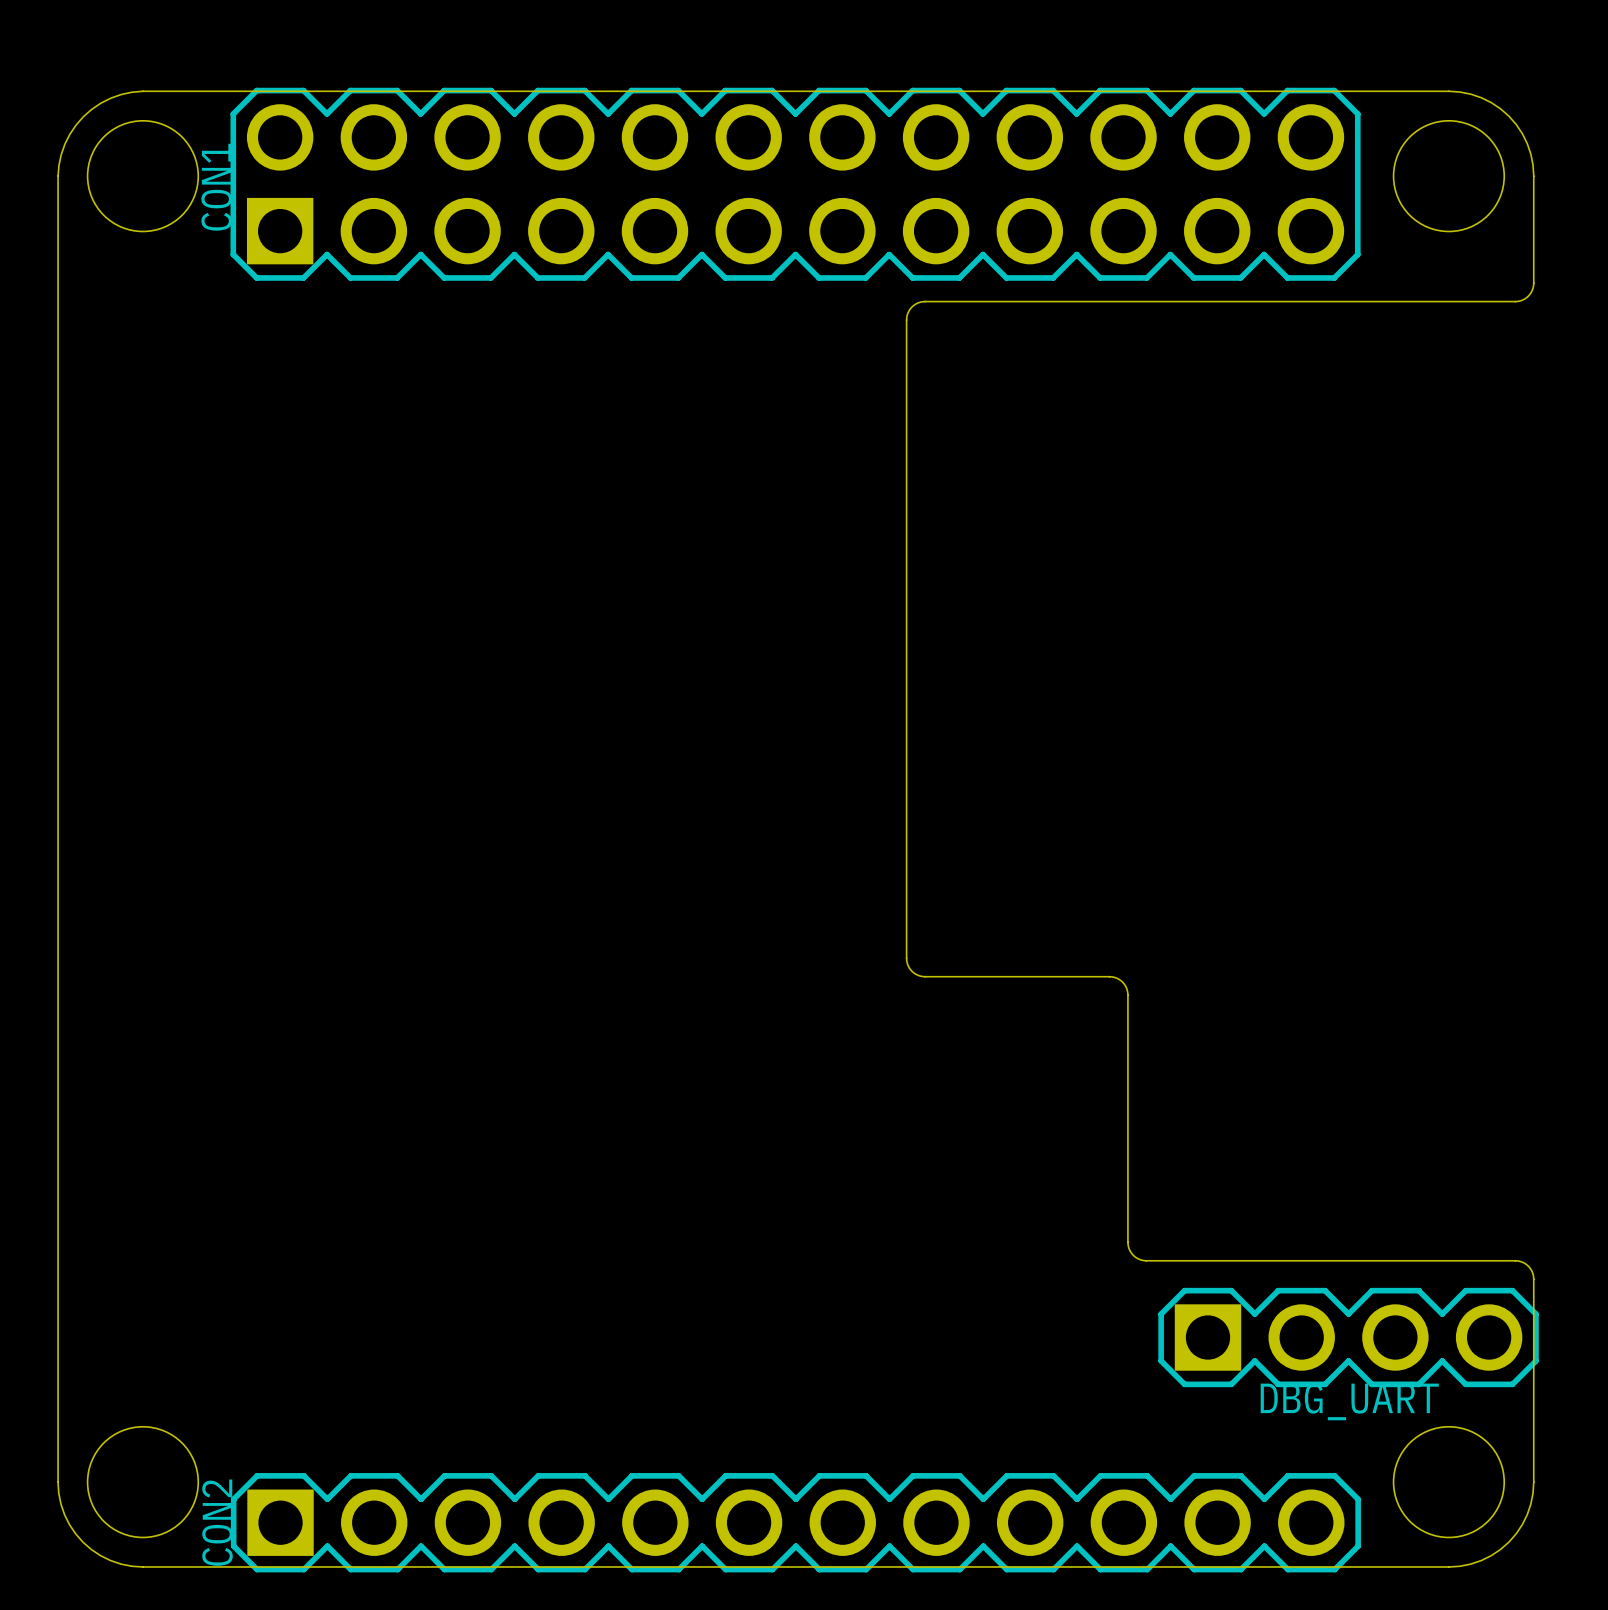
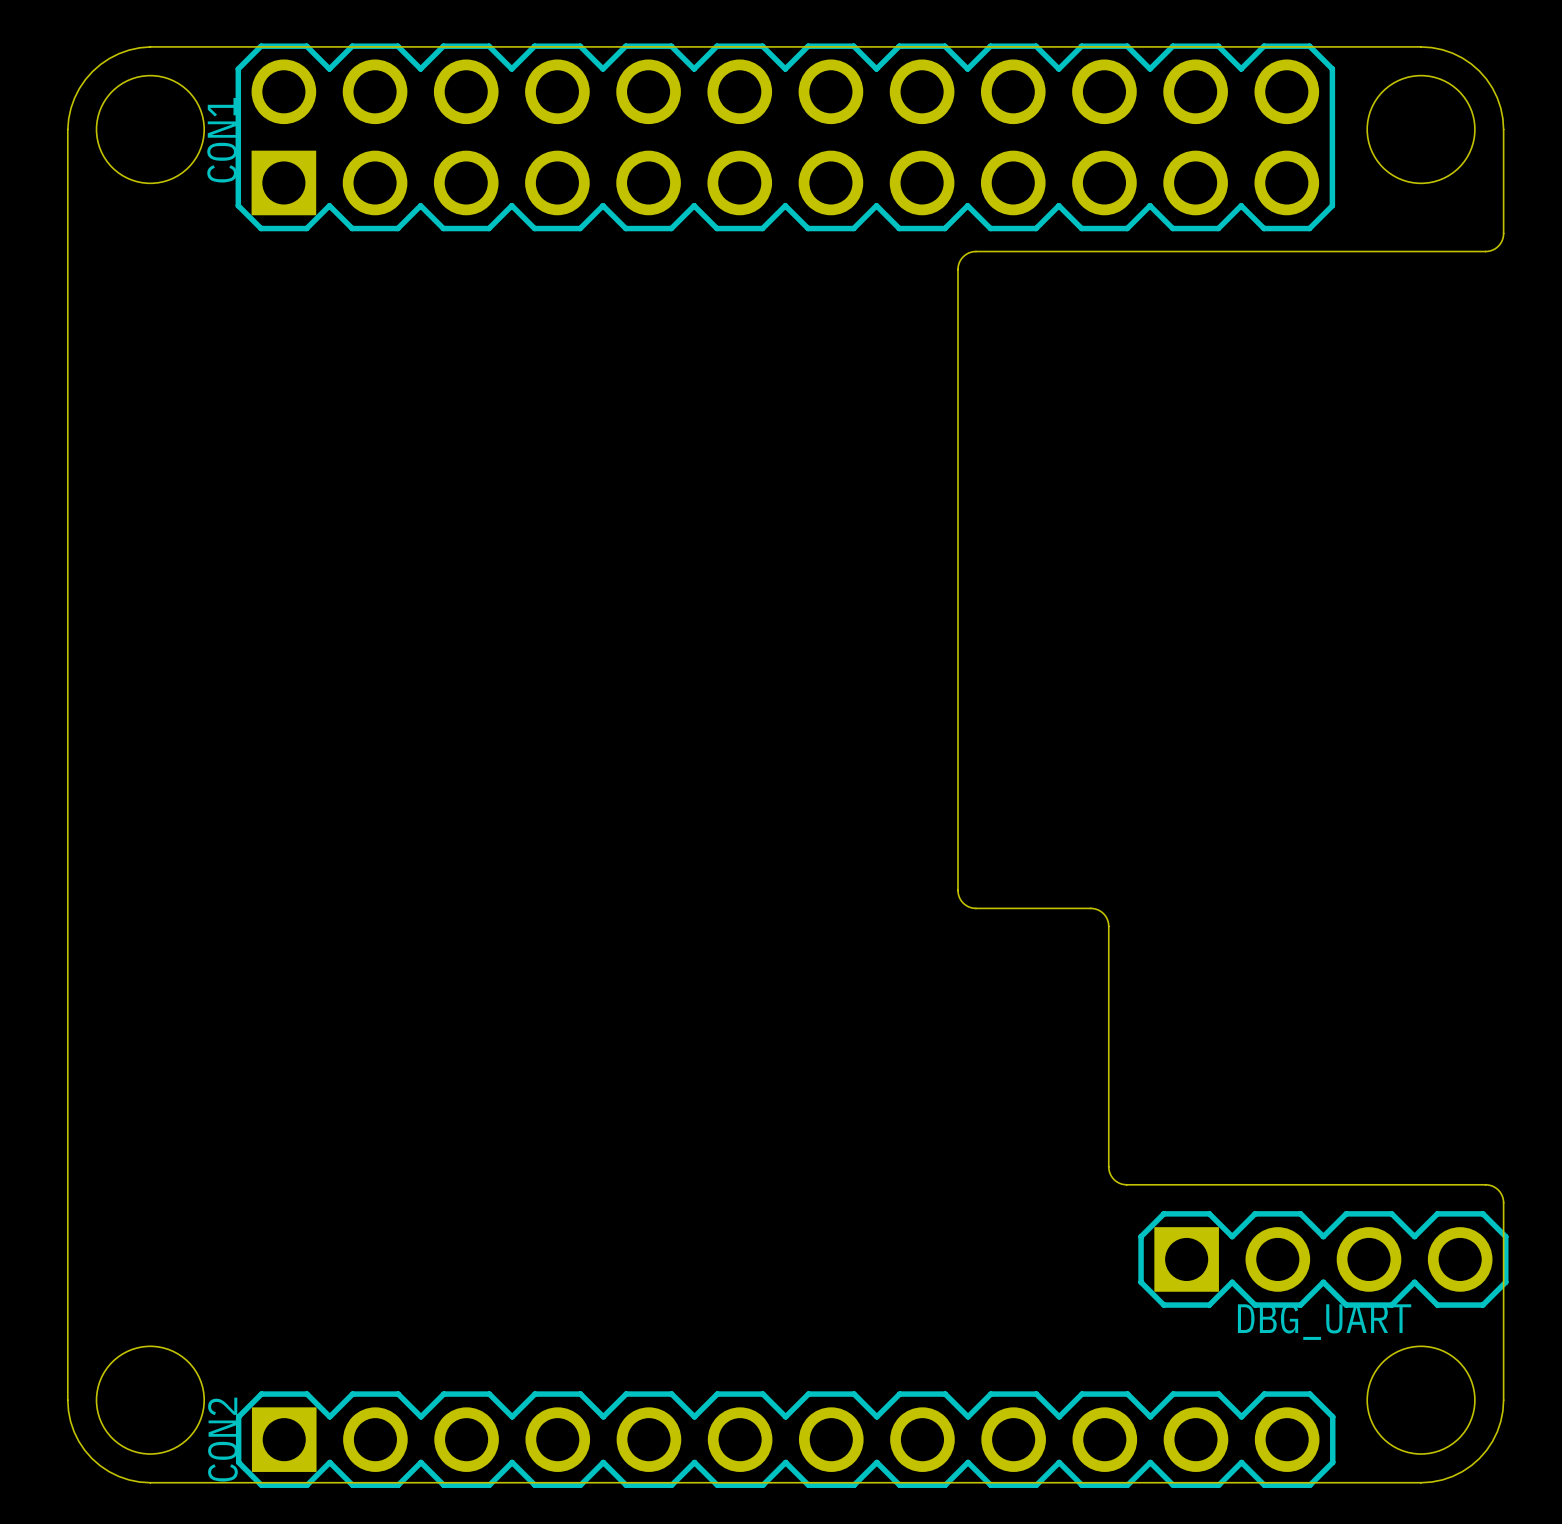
board edge: (991, 301) (920, 302) (910, 308) (906, 320) (906, 960) (911, 971) (922, 976) (991, 976) -> (975, 251) (963, 256) (958, 269) (958, 890) (963, 903) (975, 908)

